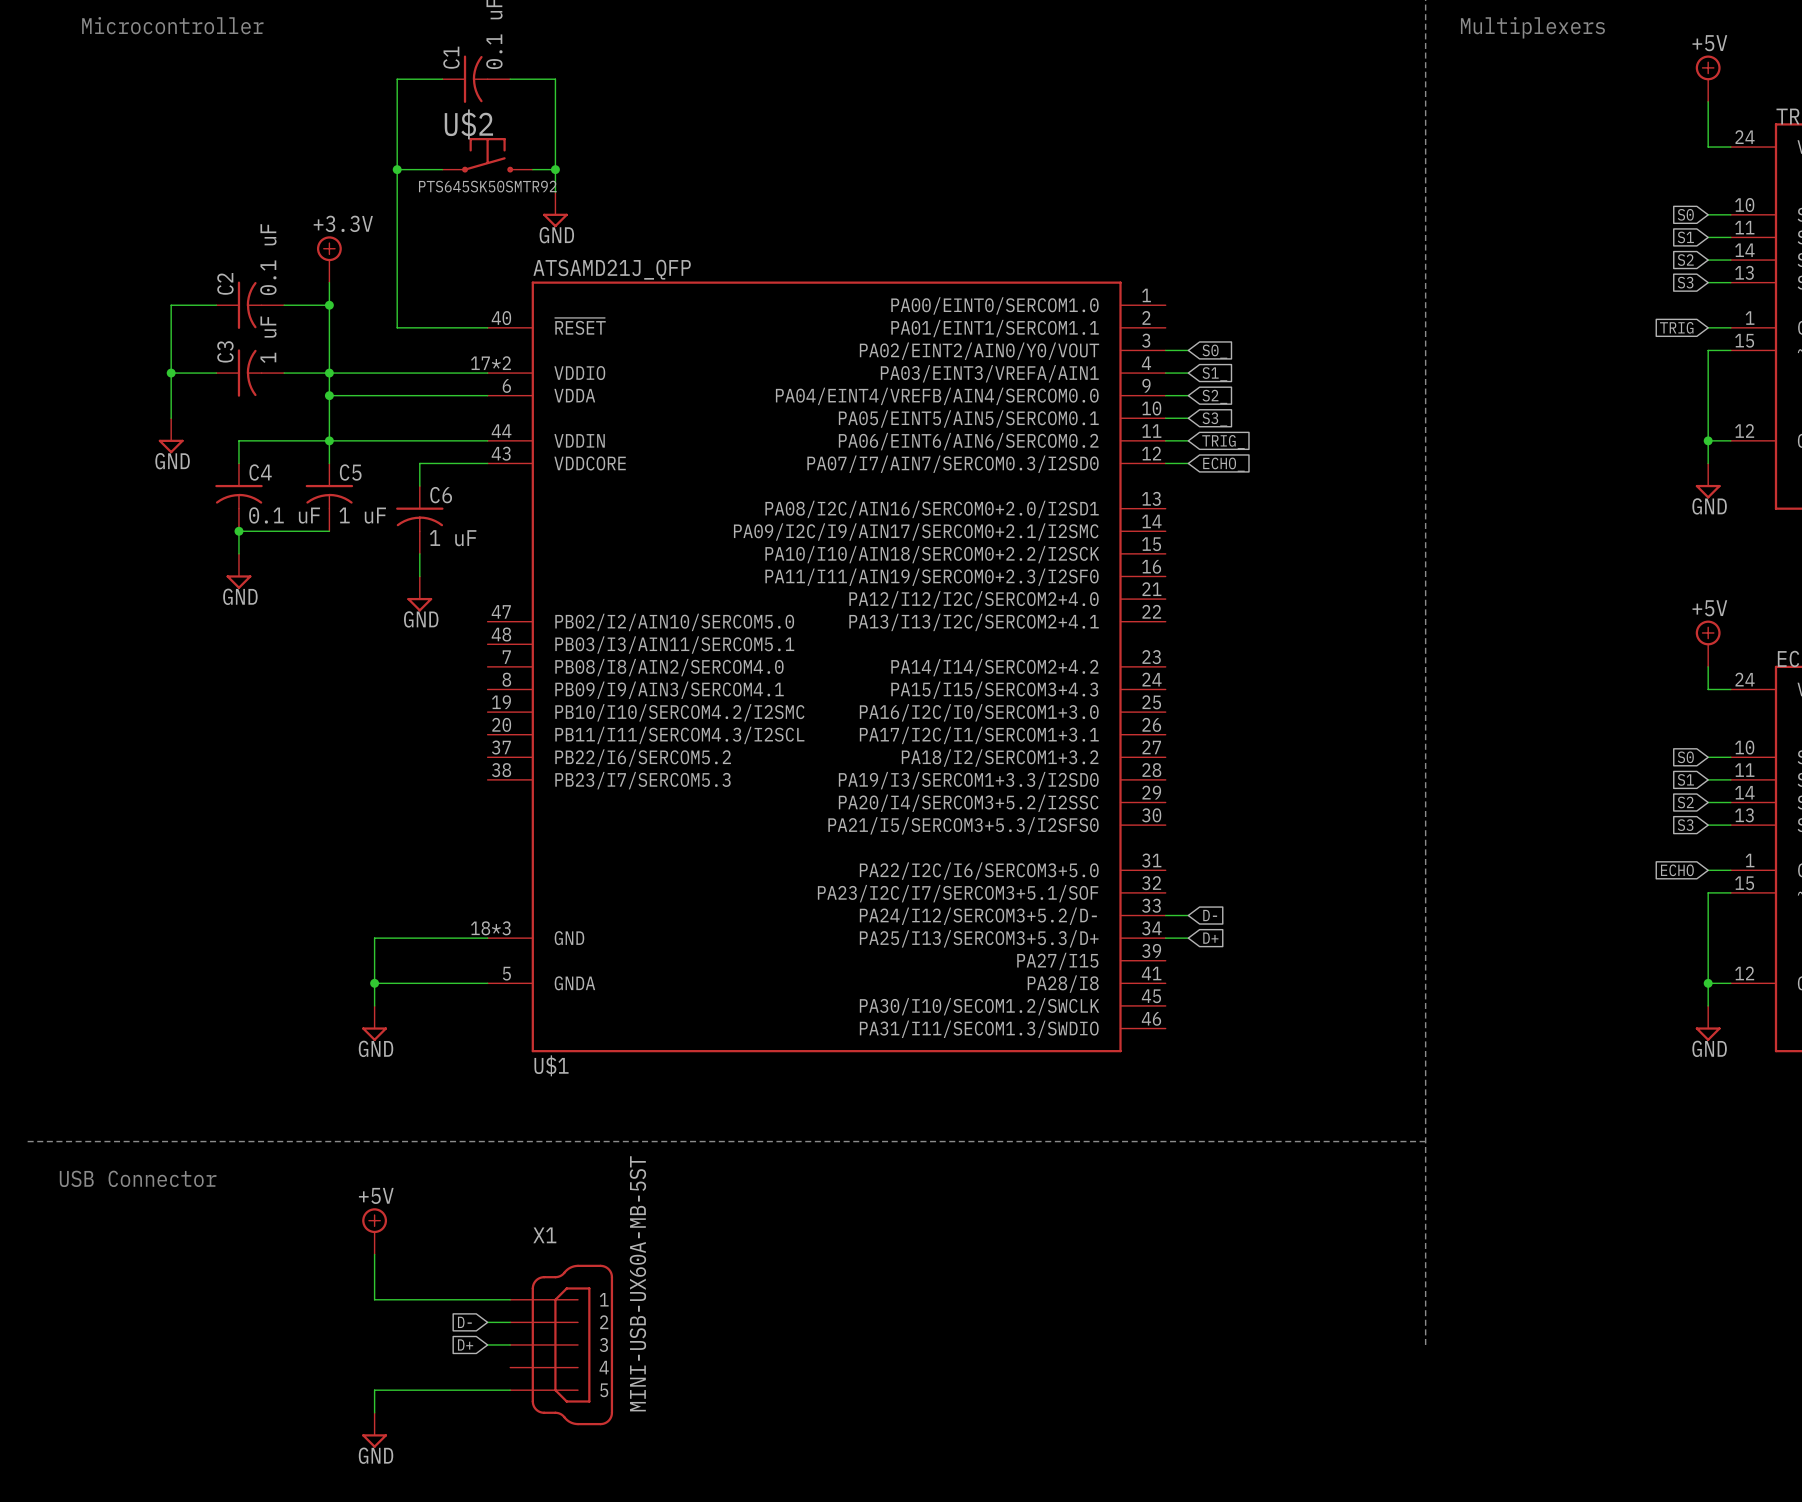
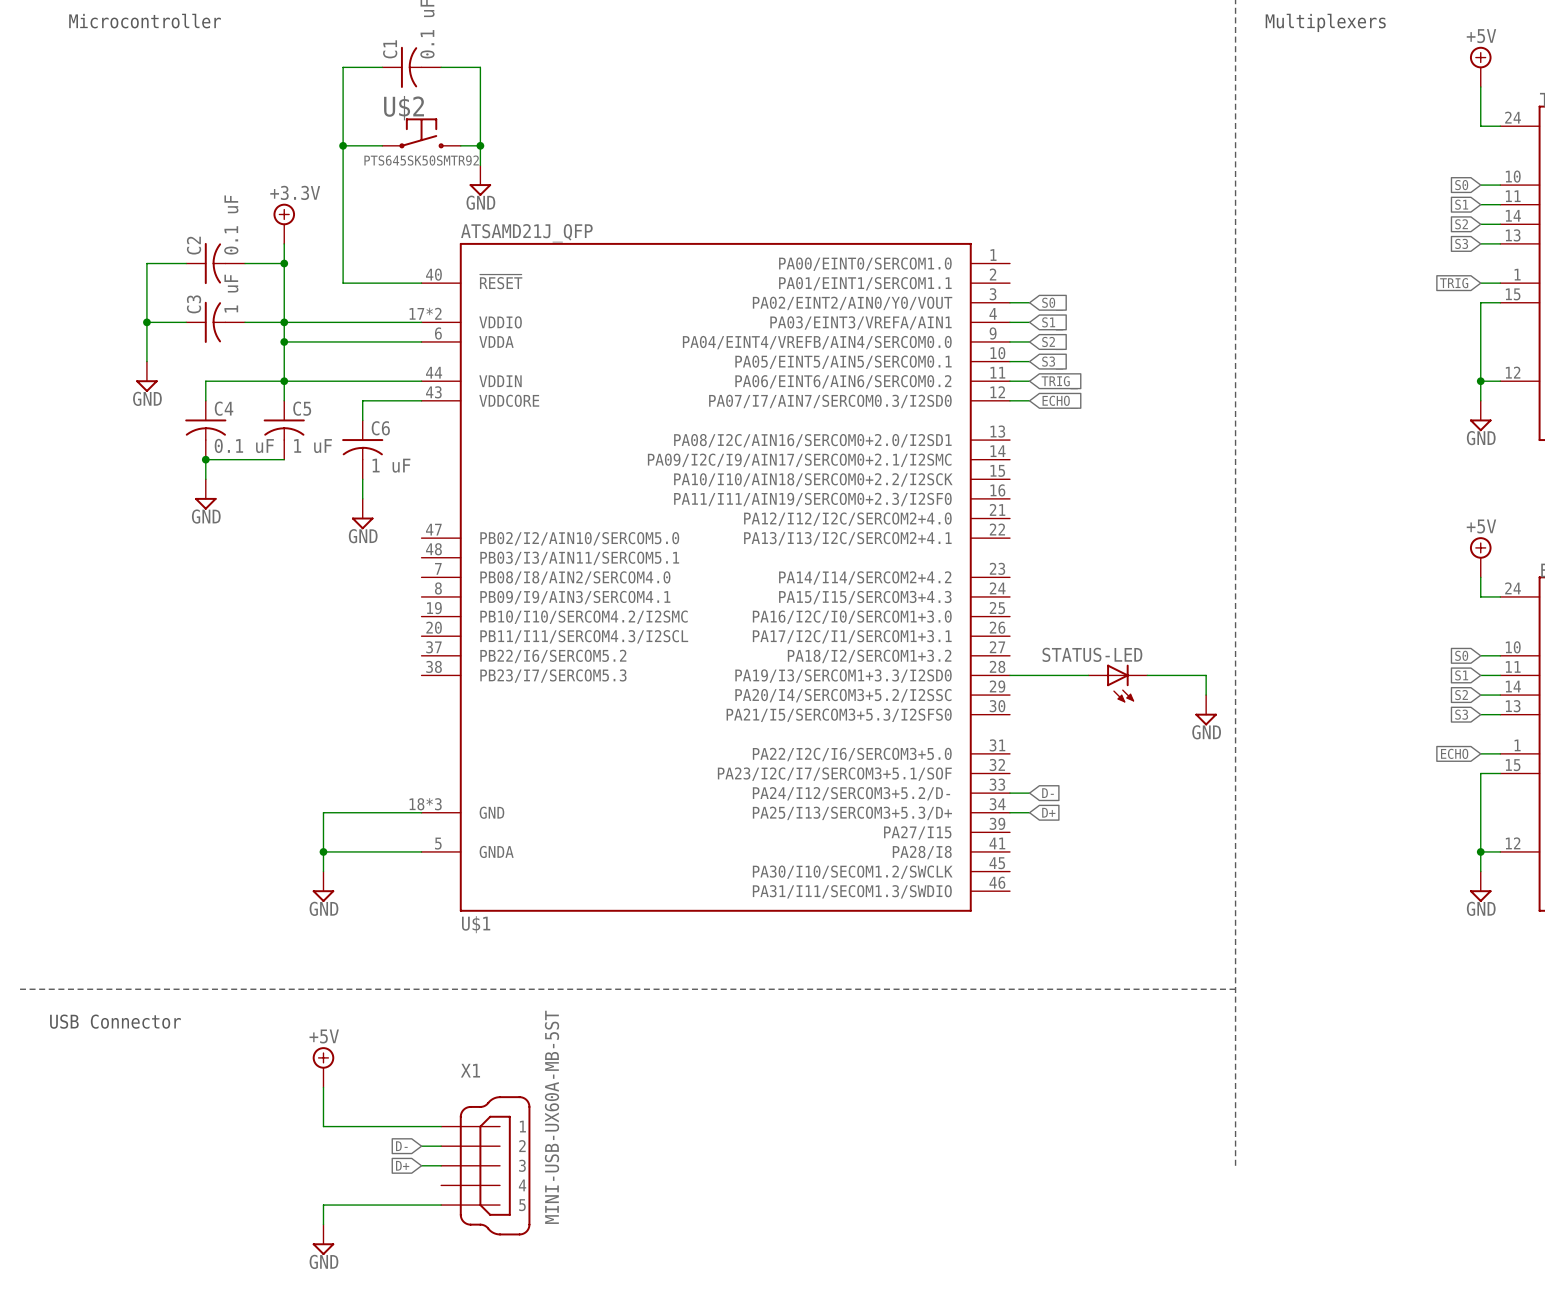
wire: none -> (1009, 675) (1088, 675)
wire: none -> (1147, 675) (1206, 675) (1206, 695)
STATUS-LED: none -> (1117, 683)
power symbol: none -> GND (1206, 710)

